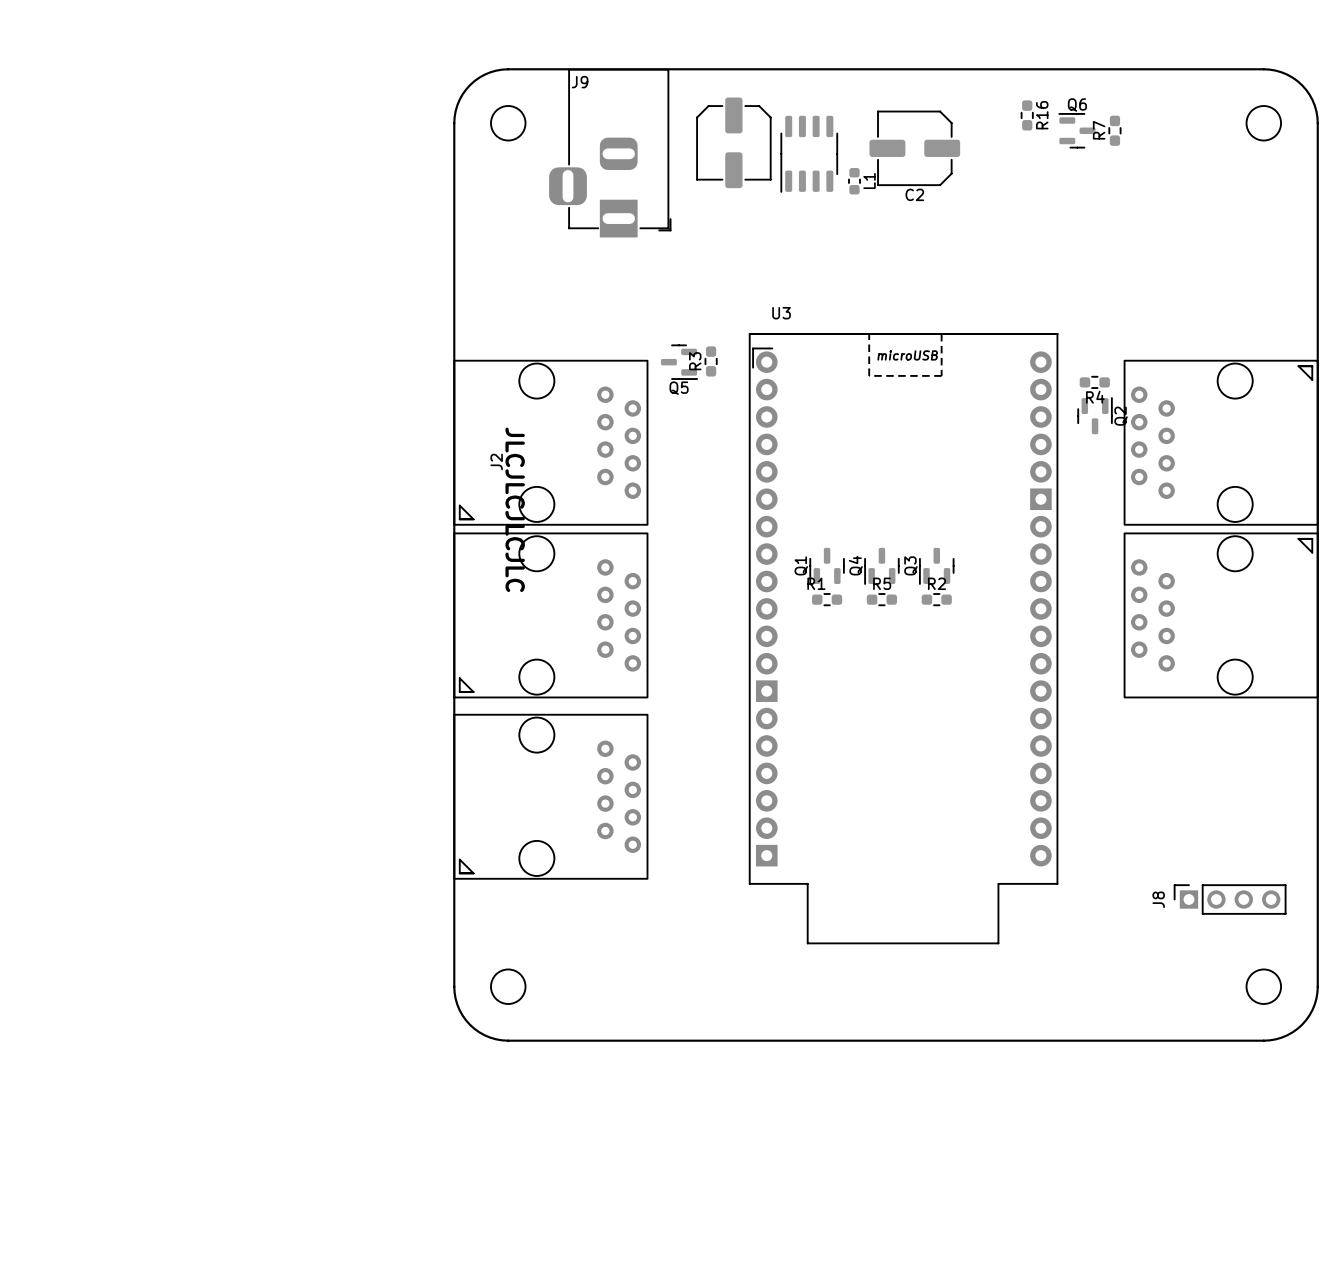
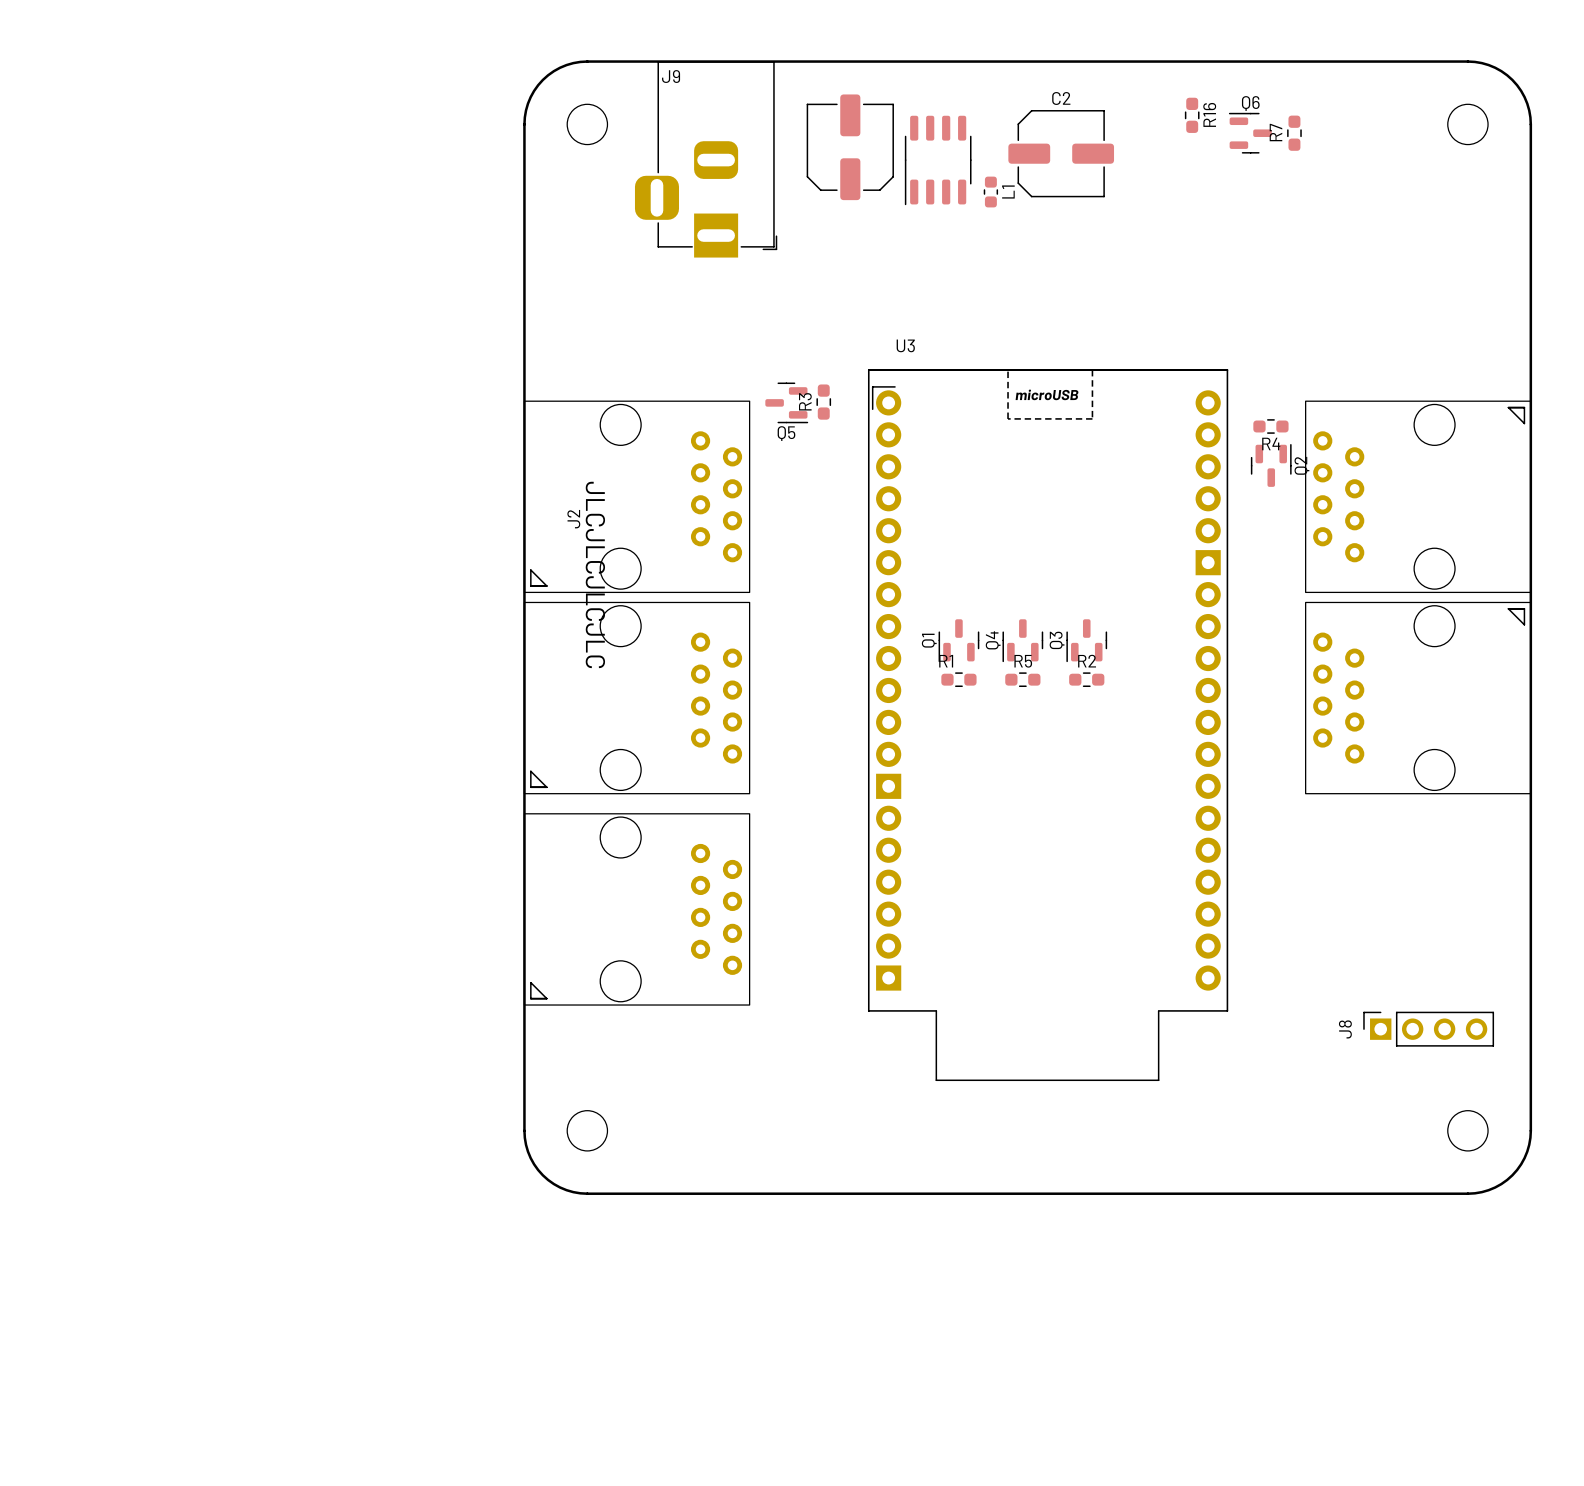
part rotation: 0° (733, 142) -> 180° (850, 147)
C2 rotation: 0° (914, 148) -> 180° (1061, 153)

